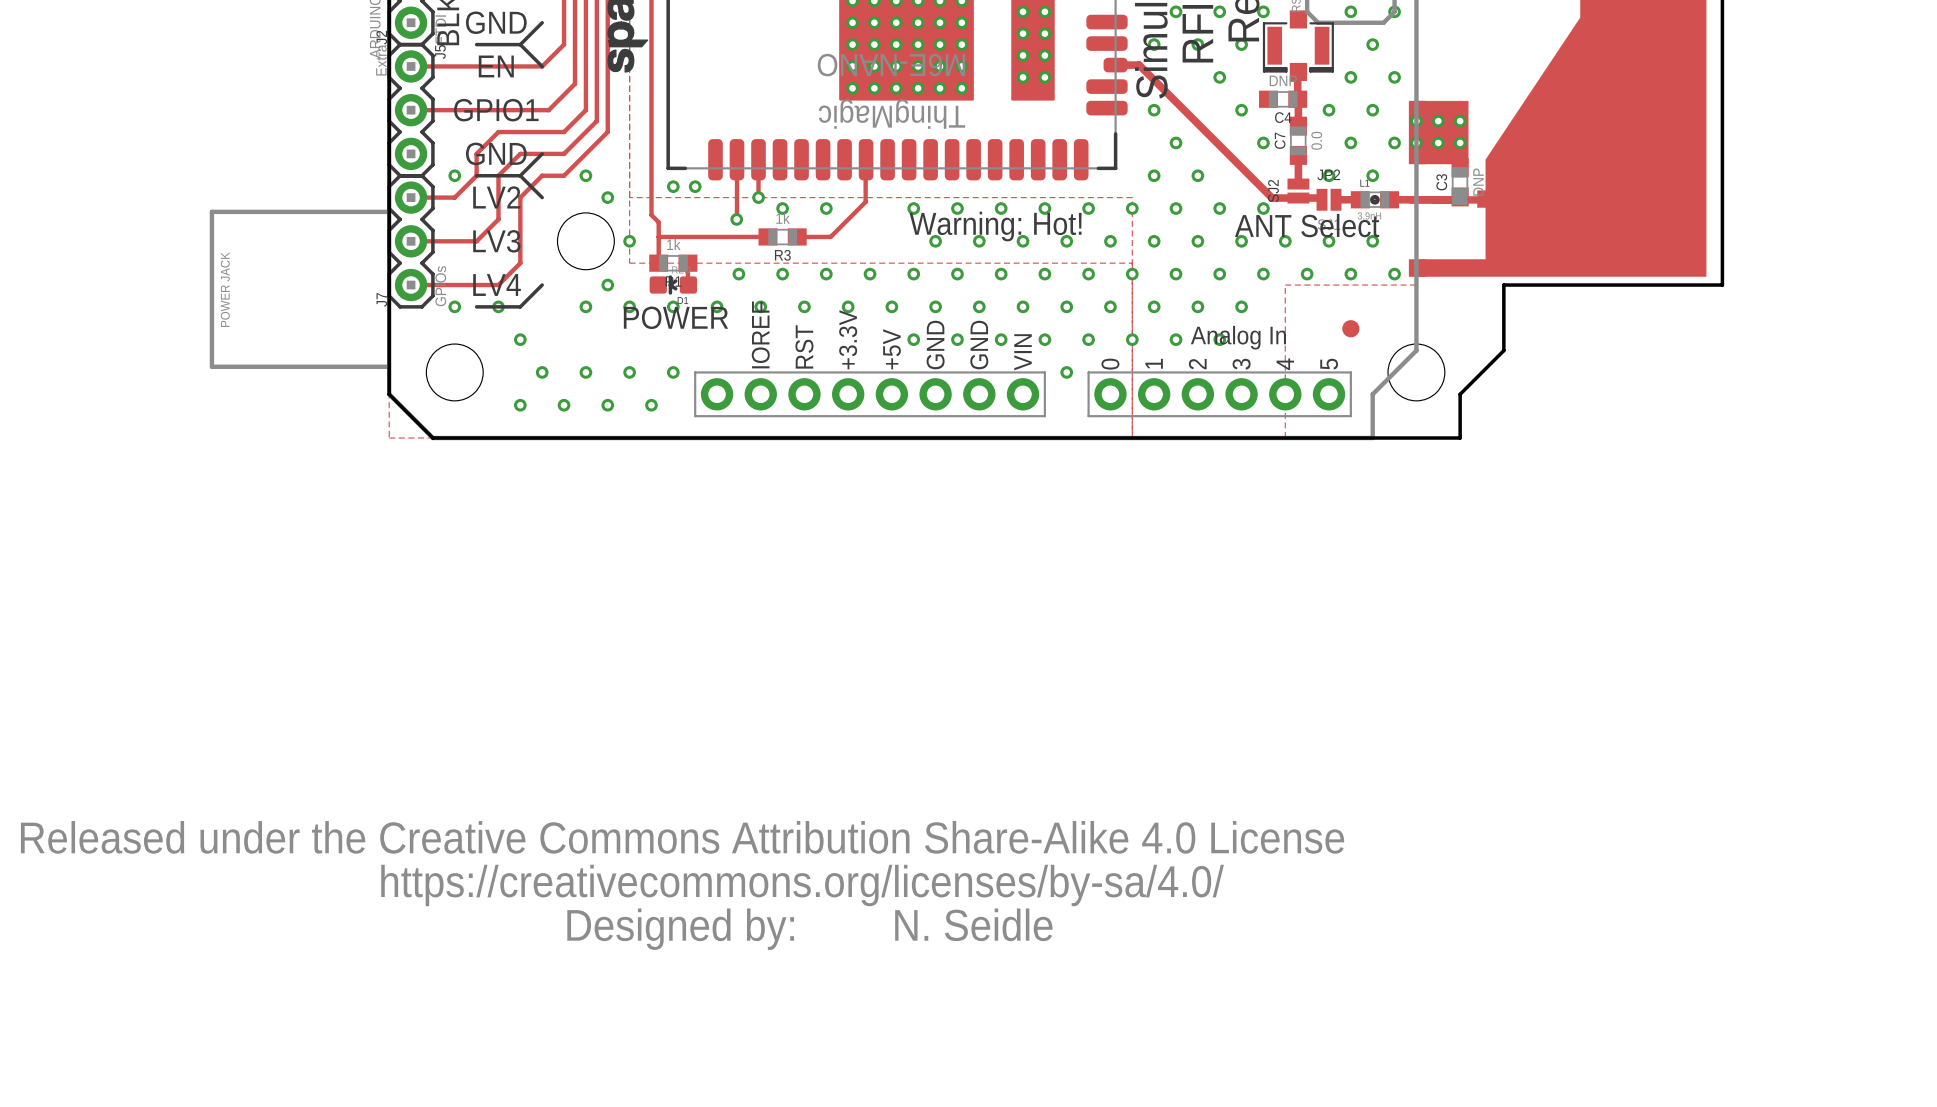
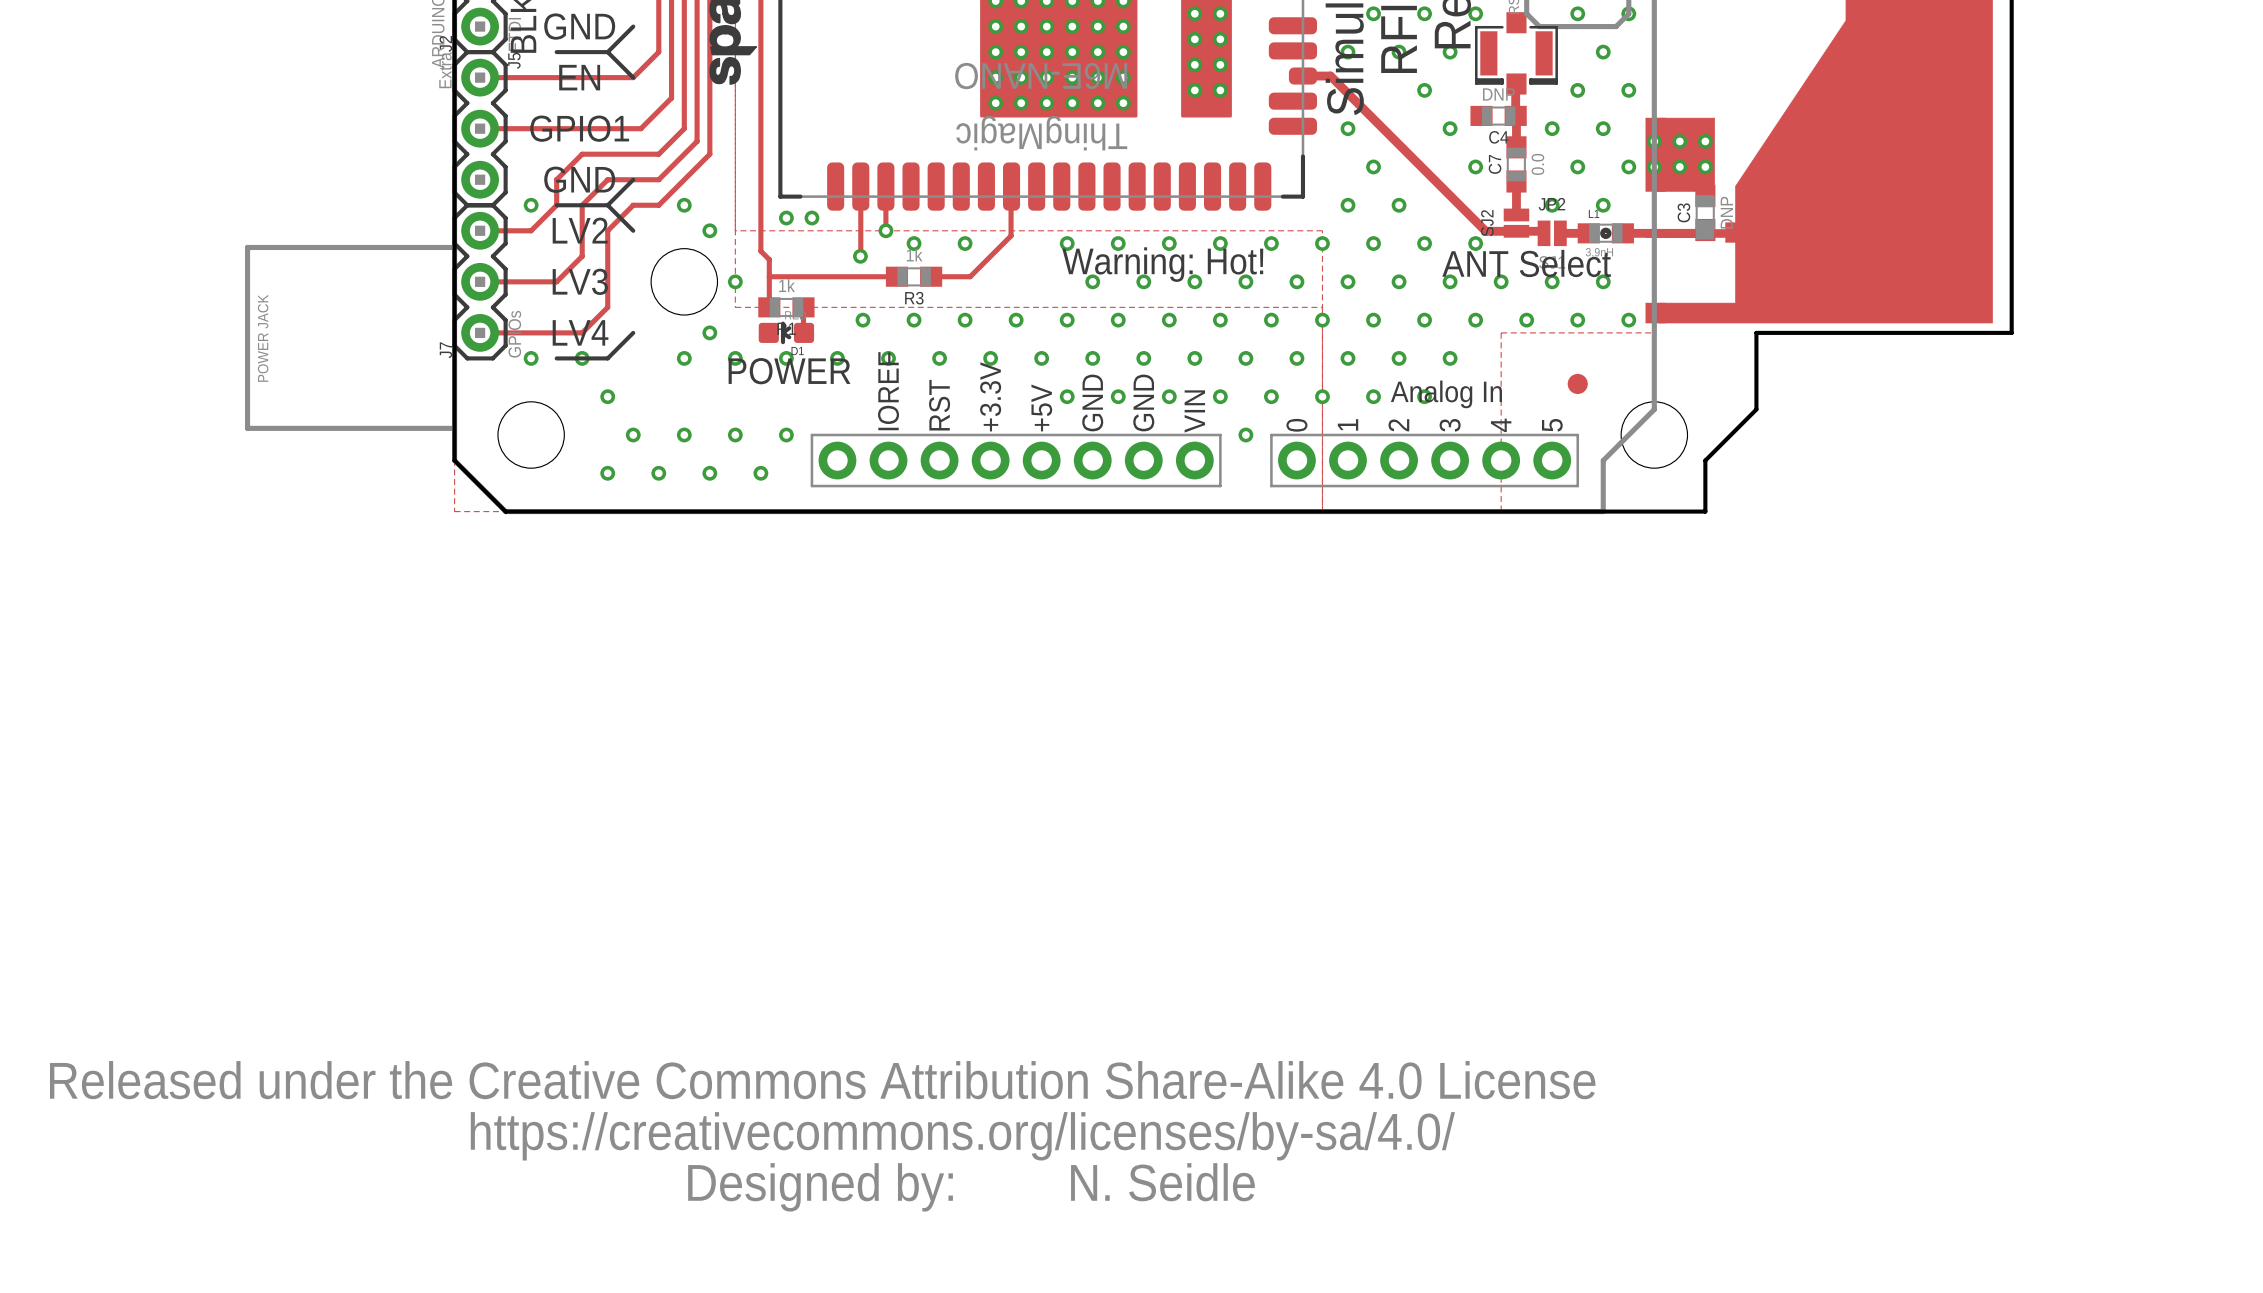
drawing position: (682, 885) -> (822, 1136)
text position: N. Seidle (973, 924) -> N. Seidle (1162, 1182)

